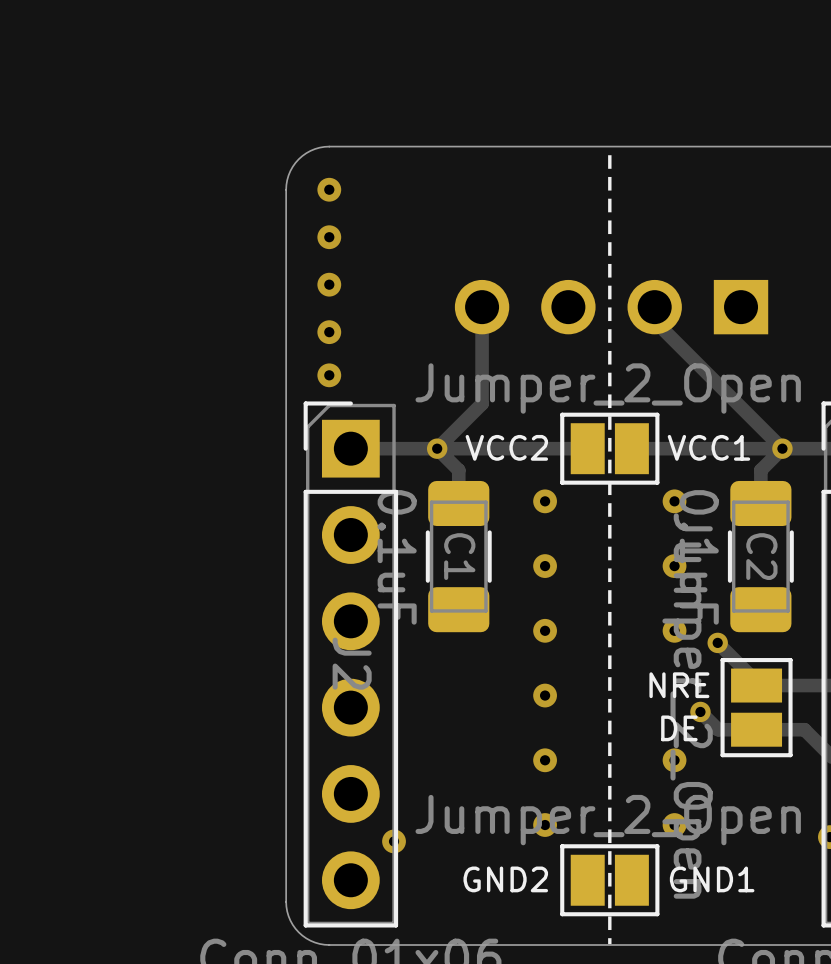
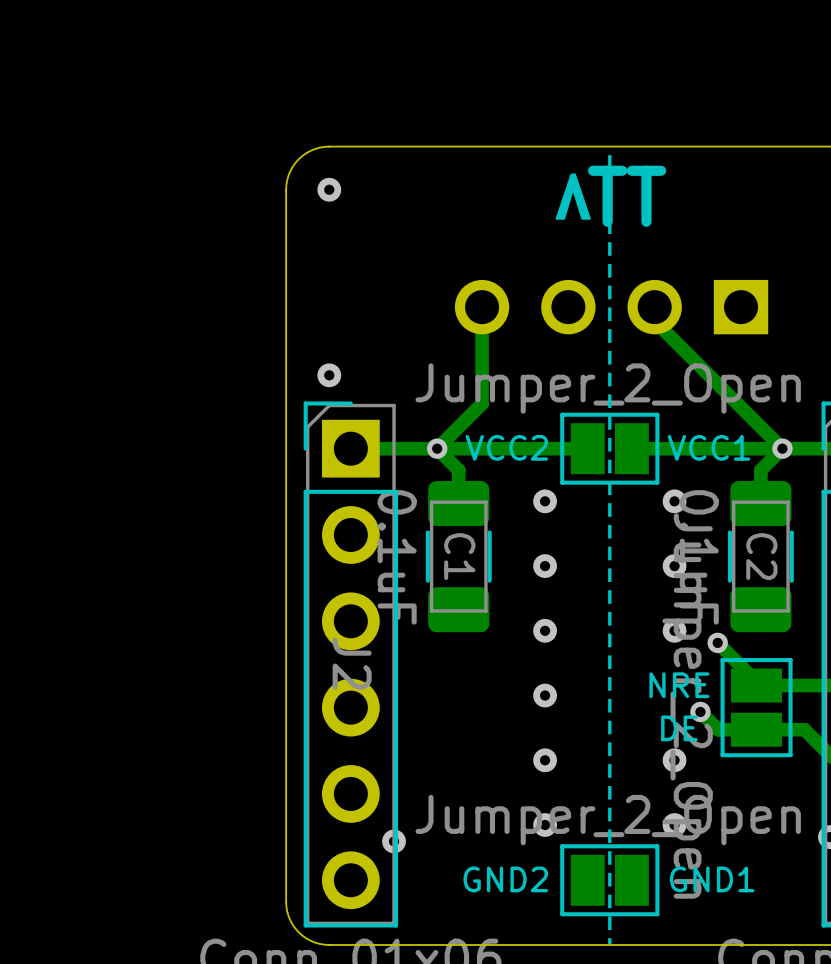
drawing: none -> [555, 173, 591, 220]
text: none -> TT (627, 196)
via: (329, 237) -> none
via: (329, 284) -> none
via: (329, 332) -> none

